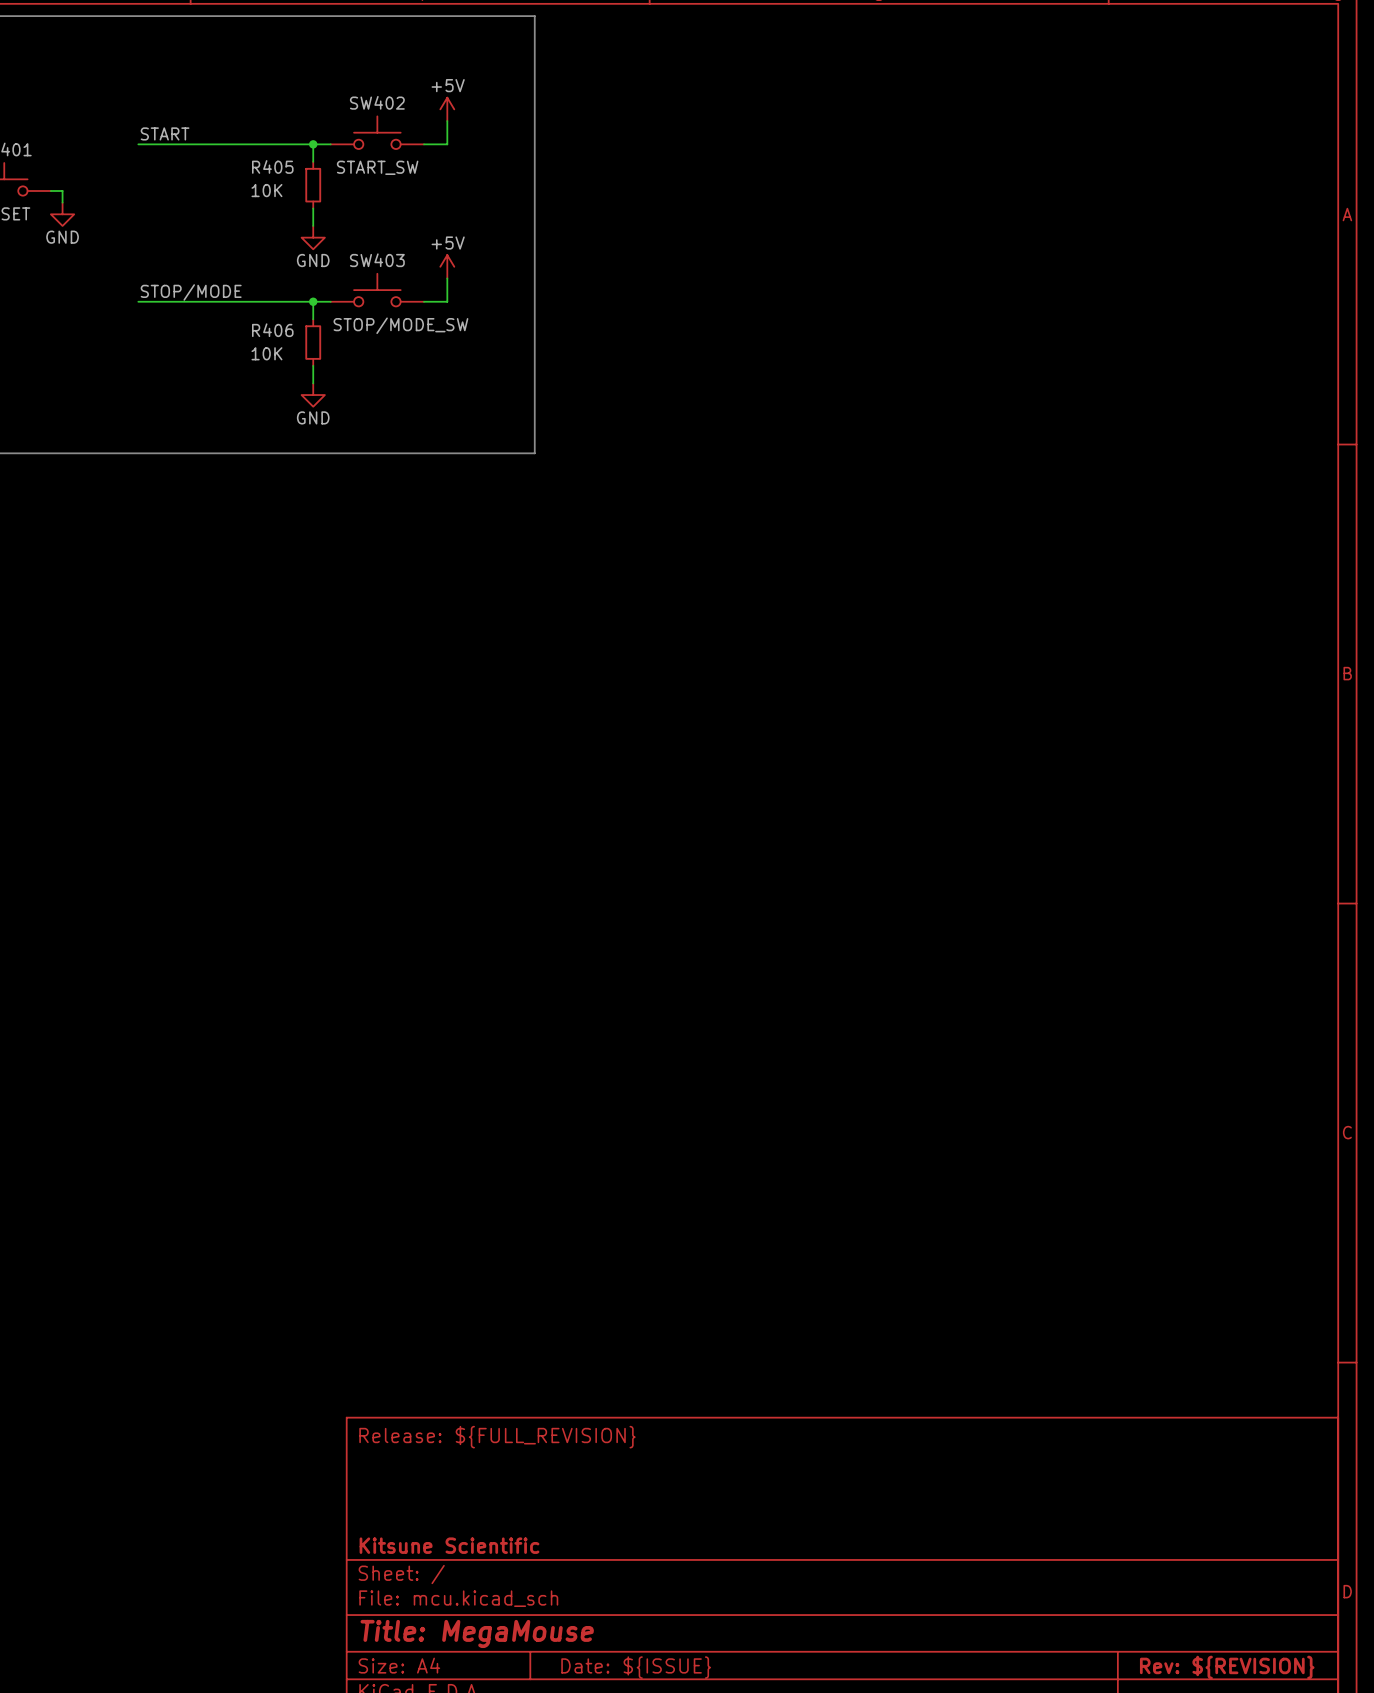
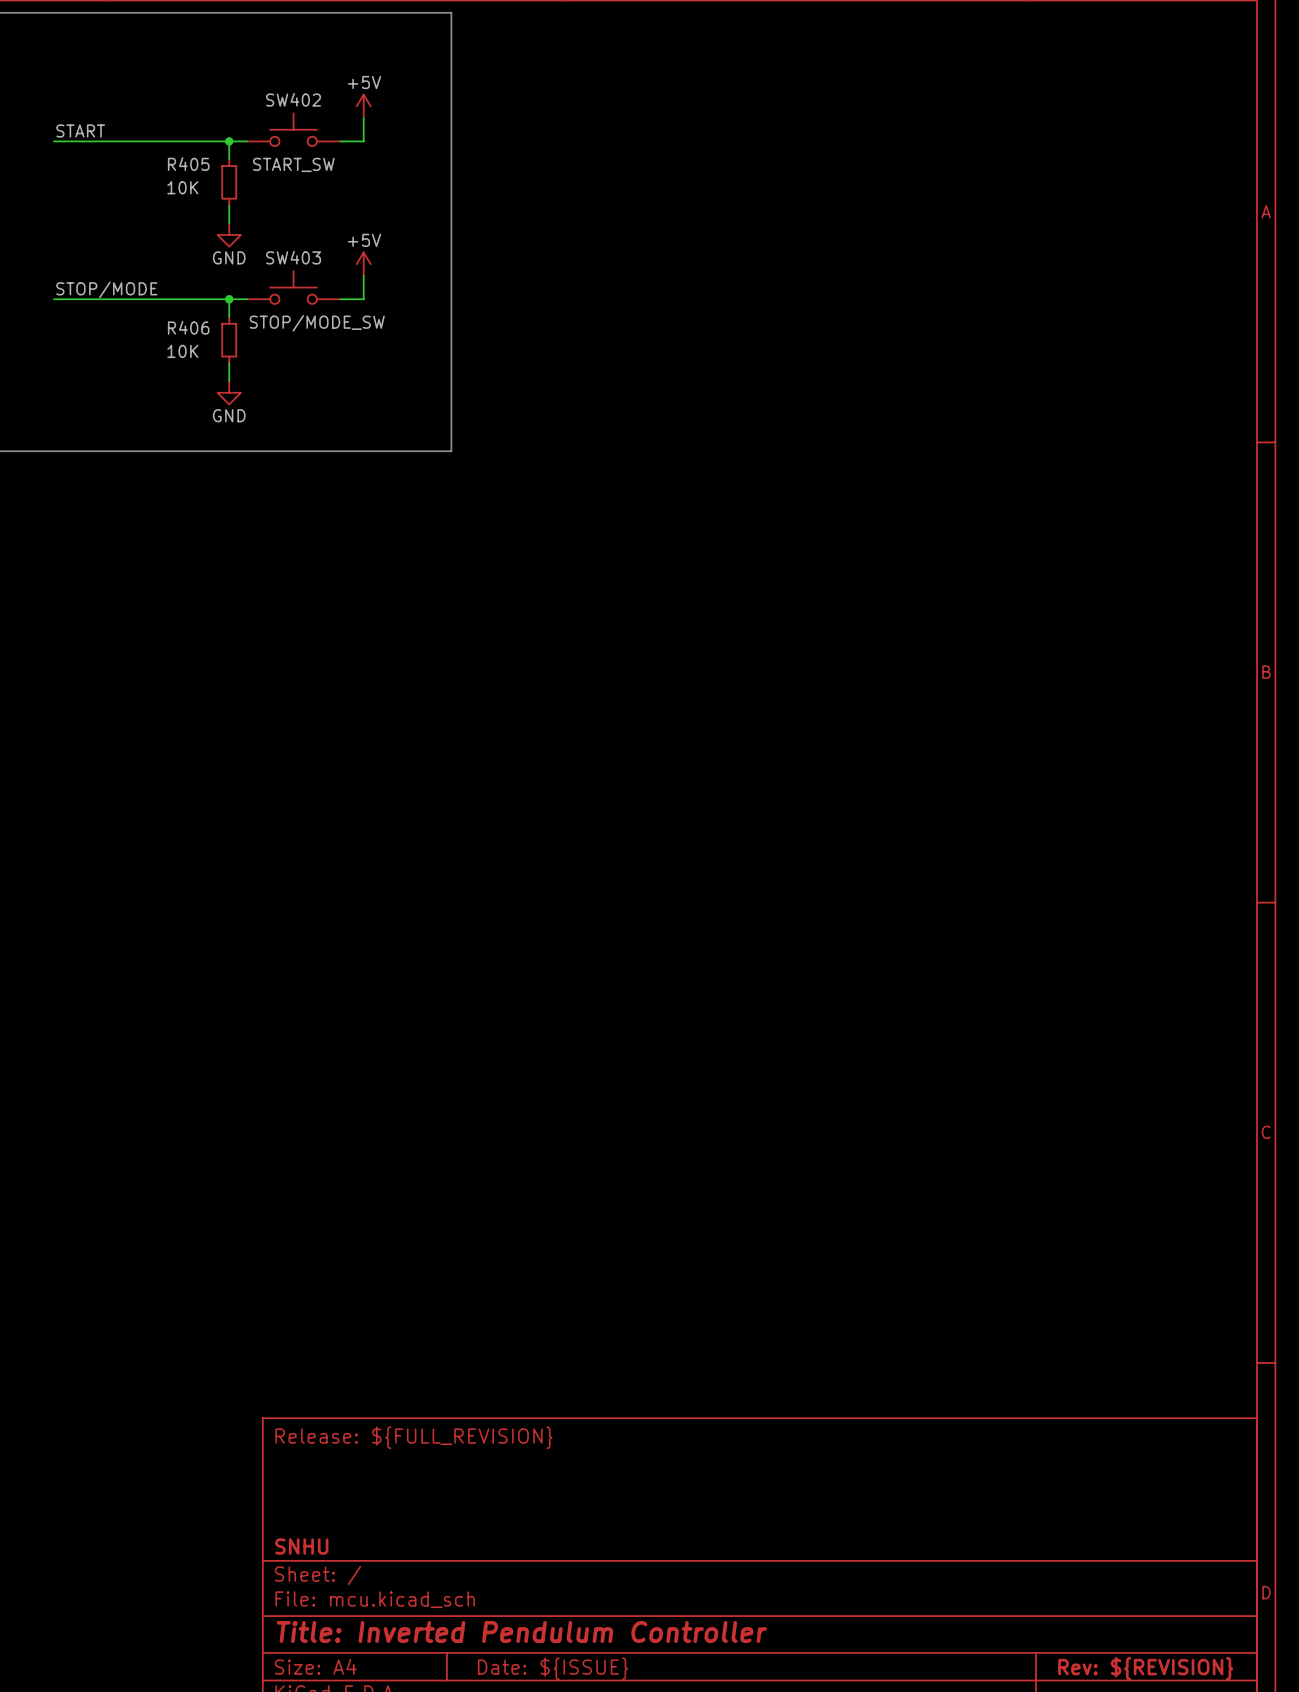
title block: Kitsune Scientific (449, 1545) -> SNHU (301, 1546)
title block: Title: MegaMouse (477, 1633) -> Title: Inverted Pendulum Controller (521, 1631)

